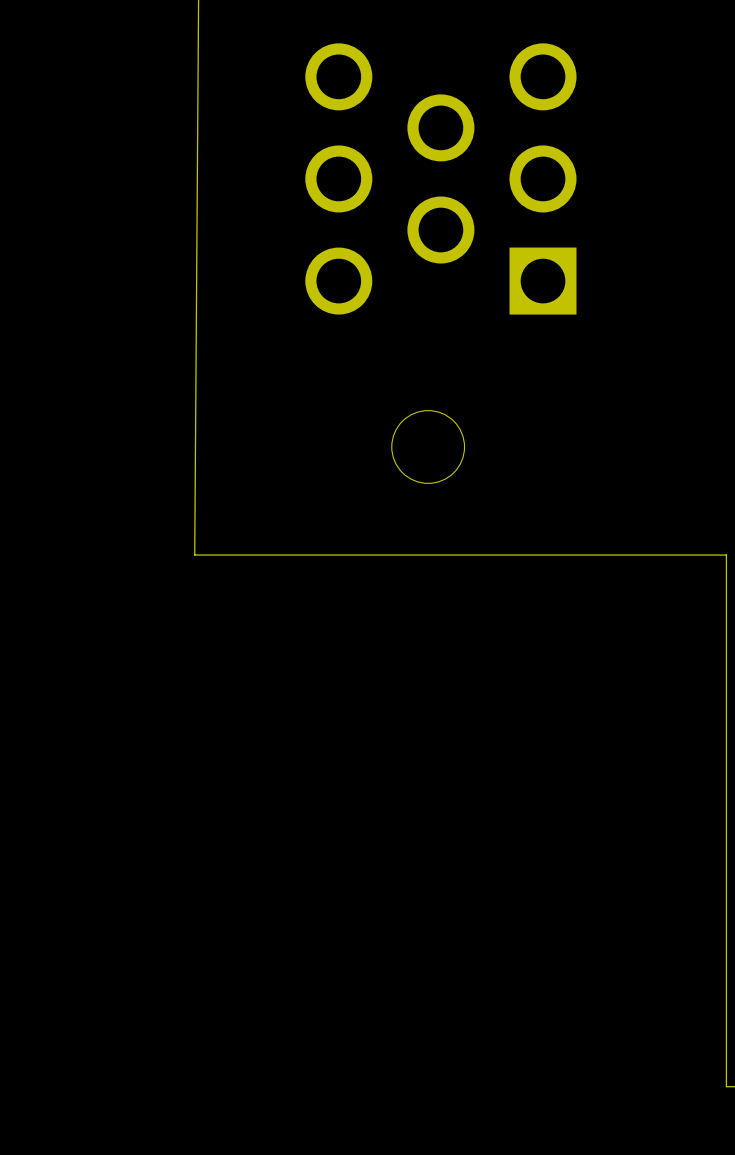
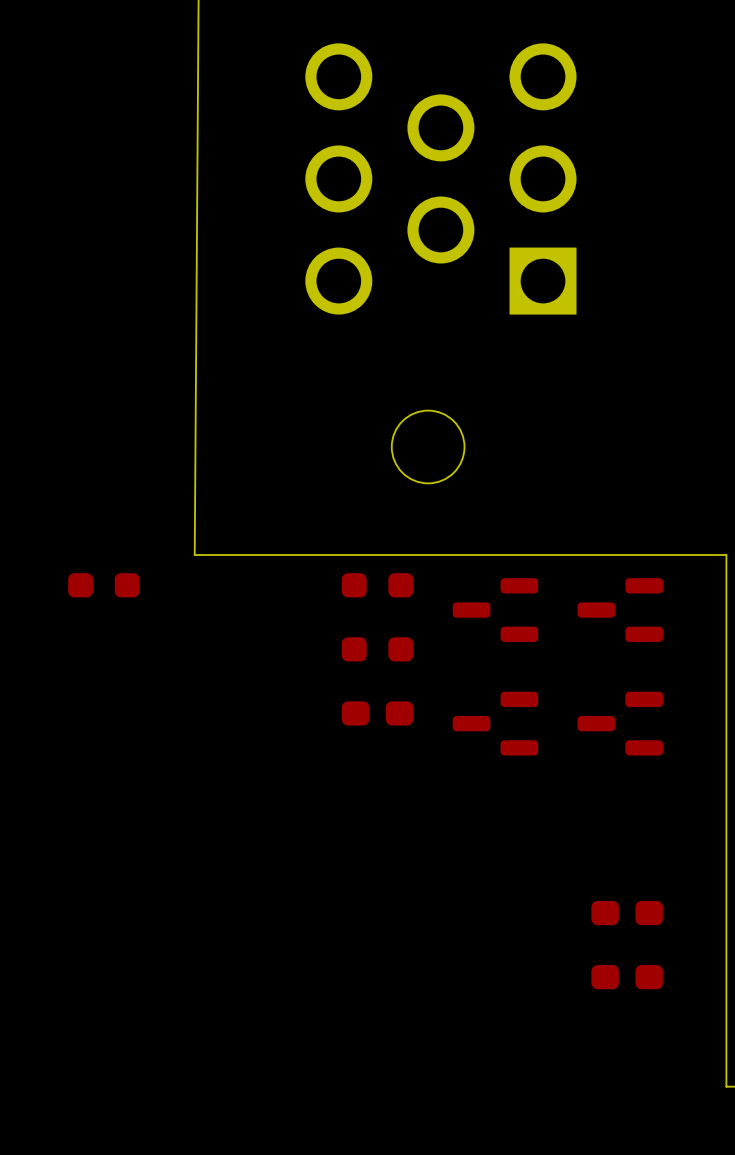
part: none -> (103, 585)
part: none -> (377, 585)
part: none -> (495, 610)
part: none -> (620, 610)
part: none -> (377, 649)
part: none -> (377, 713)
part: none -> (495, 723)
part: none -> (620, 723)
part: none -> (627, 913)
part: none -> (627, 977)

